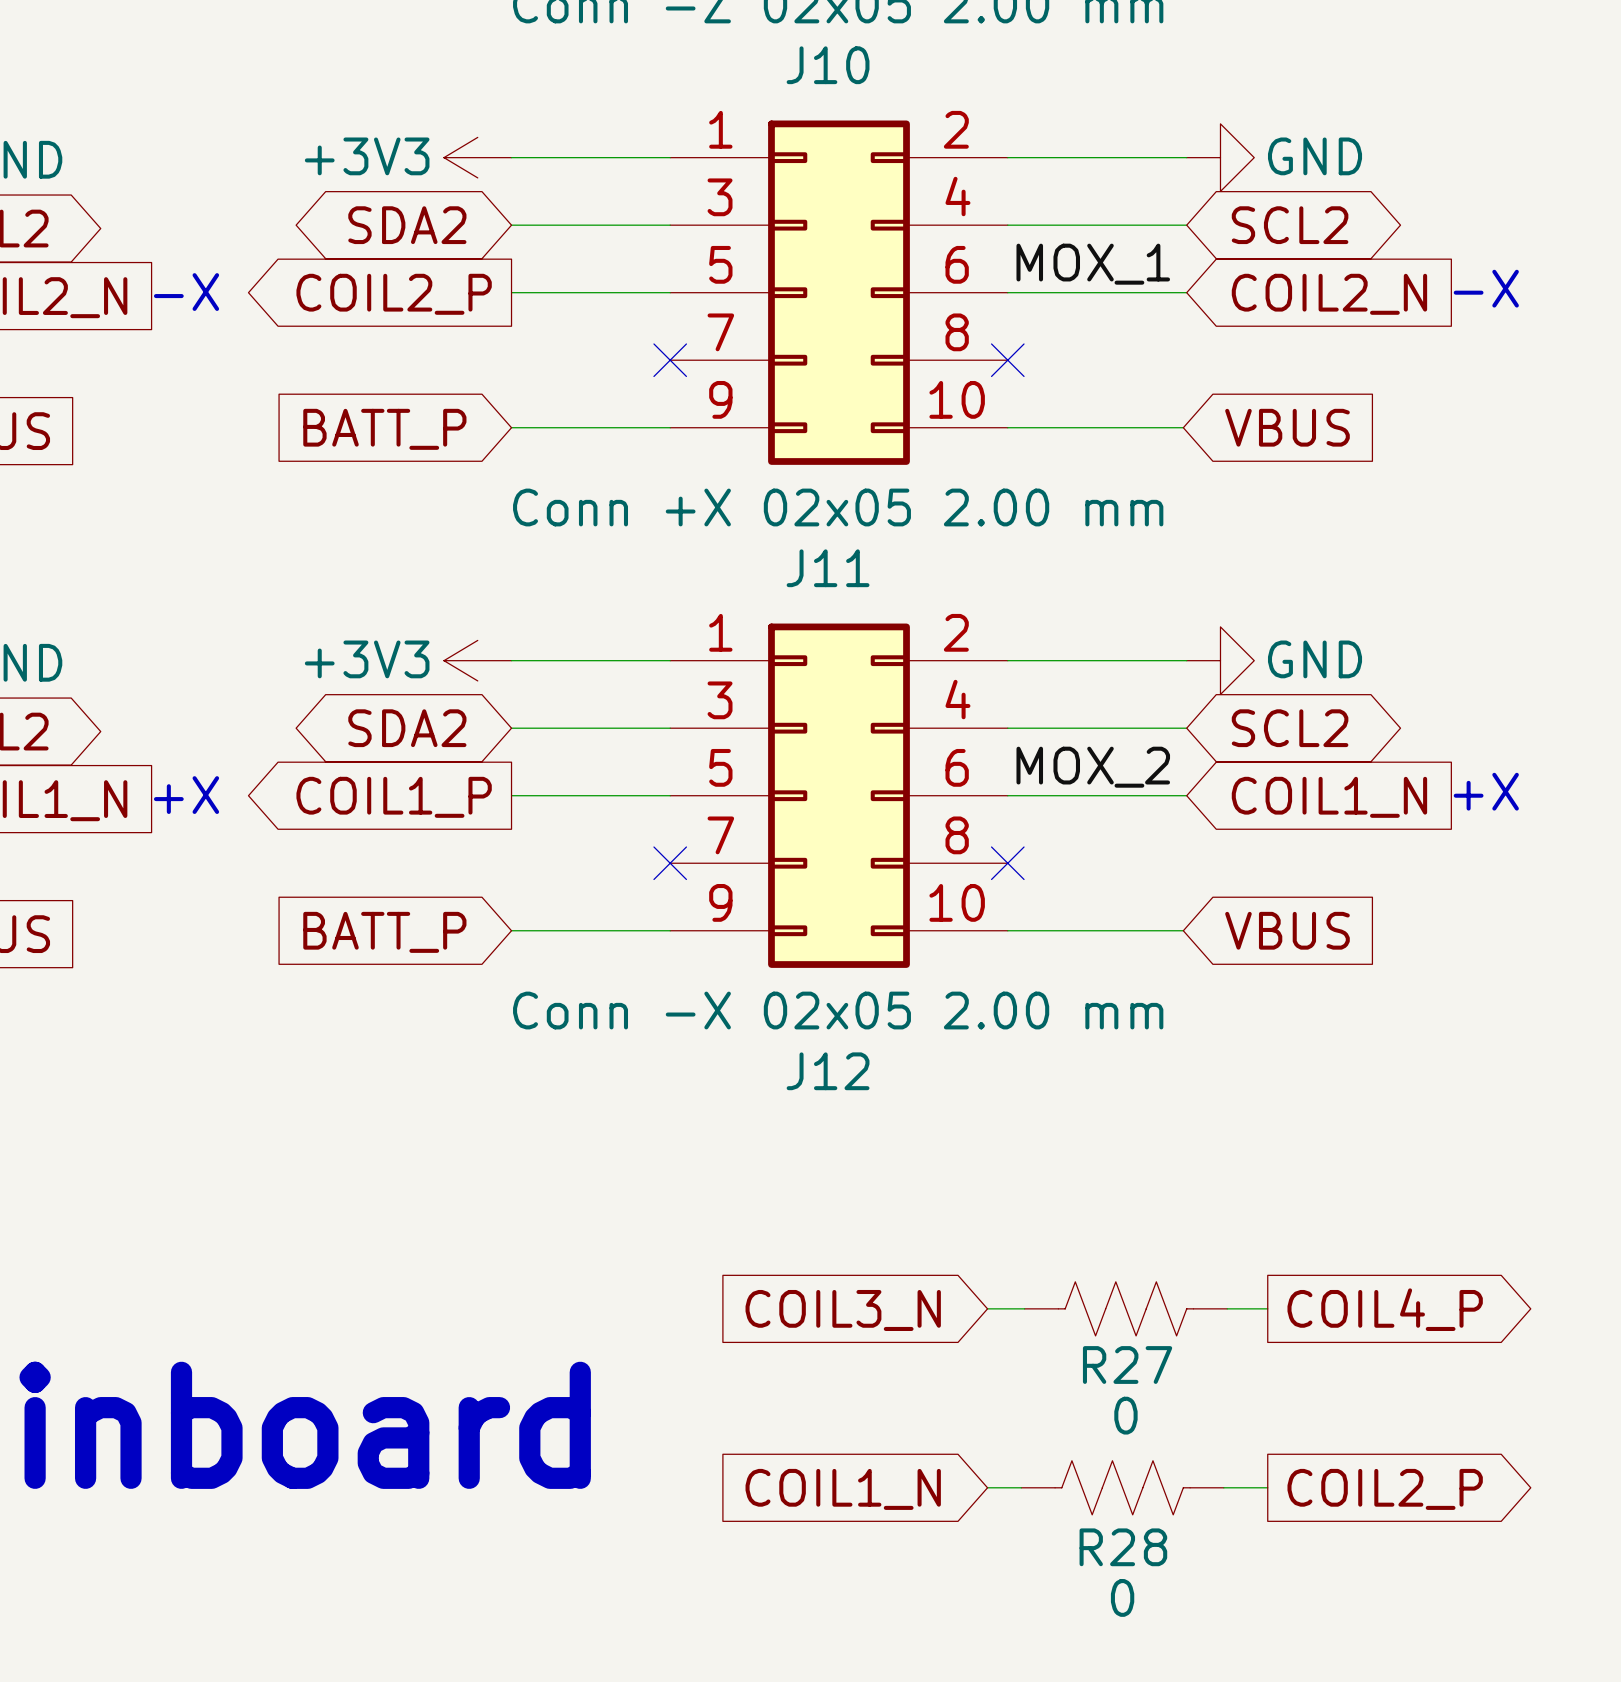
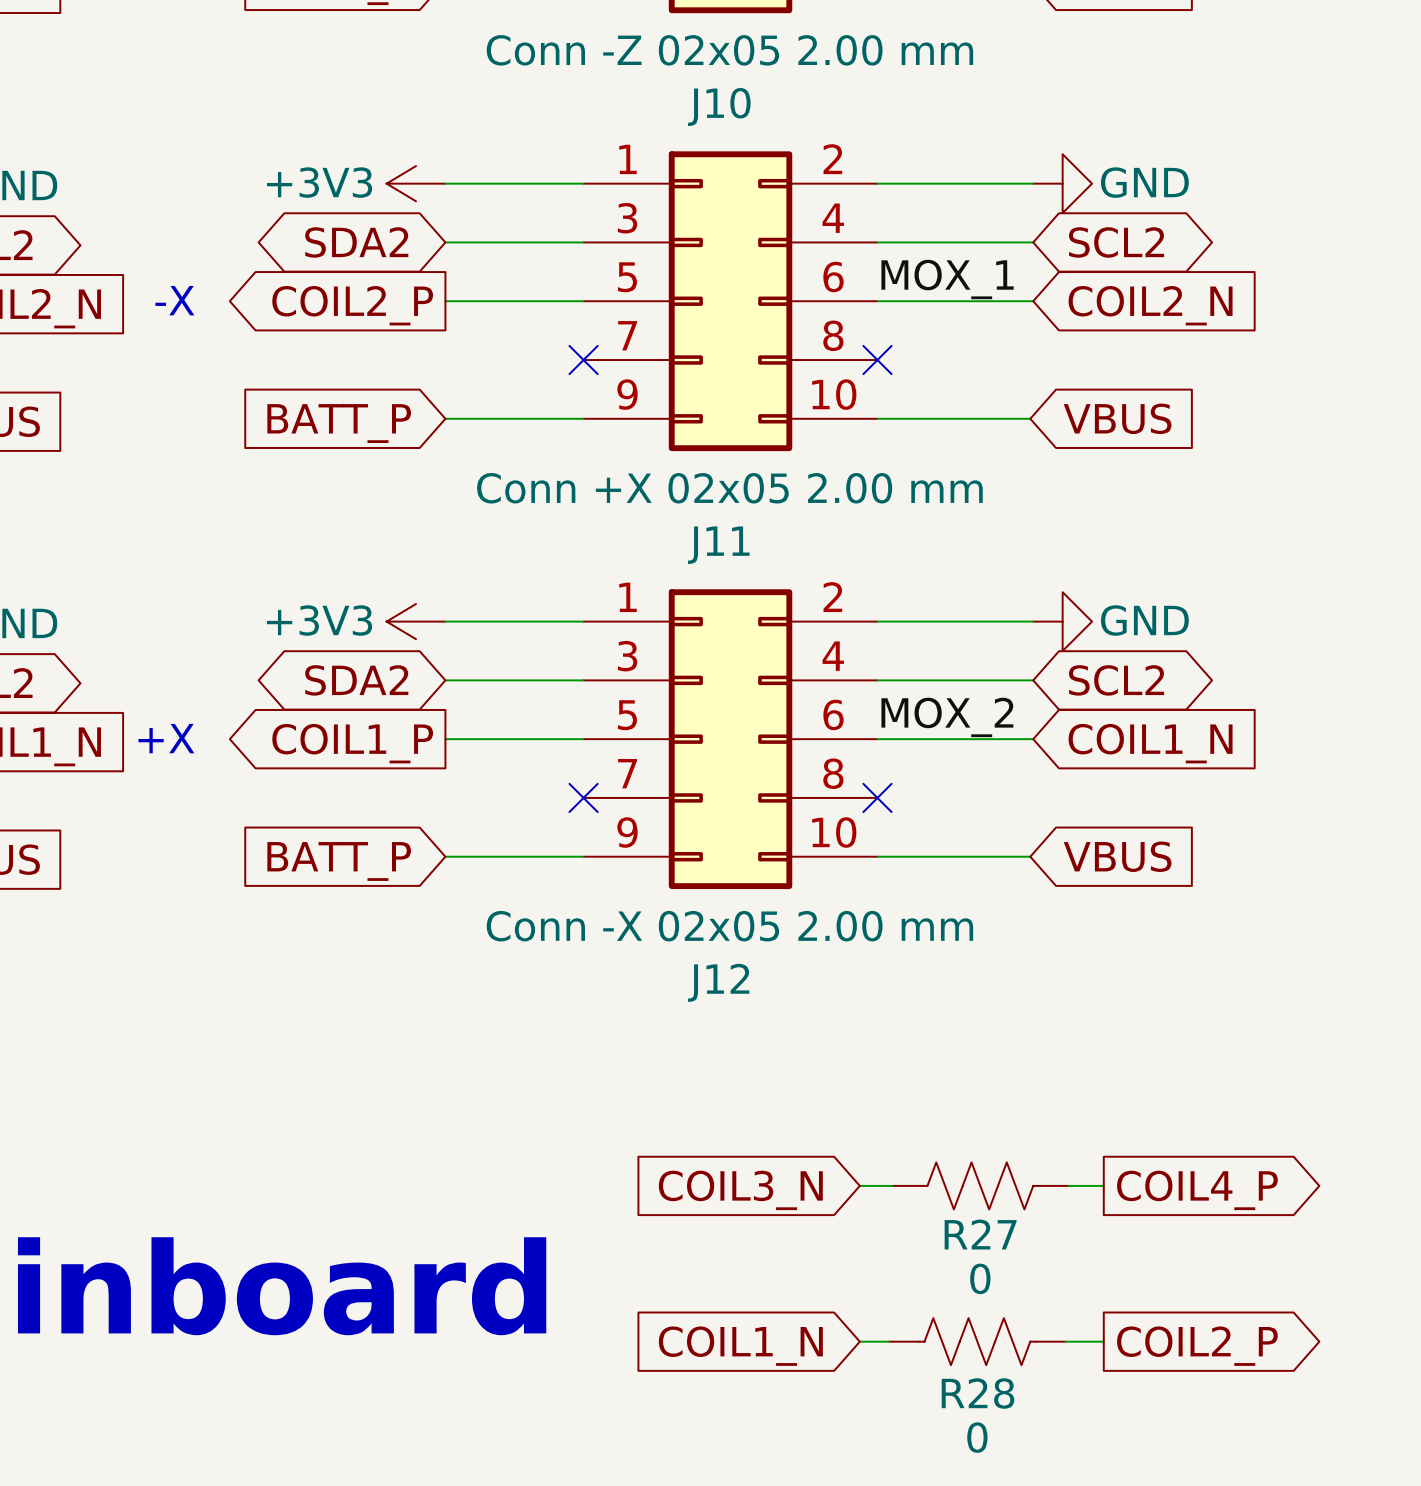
text: -X (1486, 288) -> none
text: +X (1486, 791) -> none

